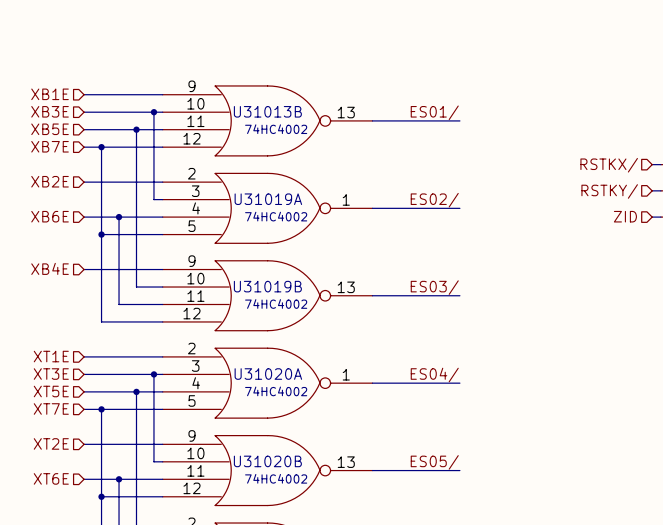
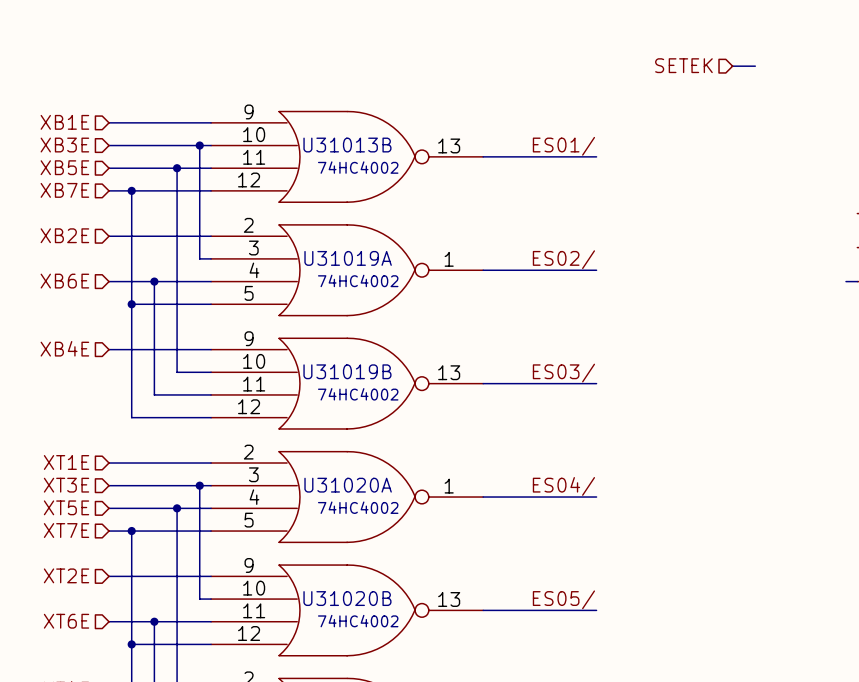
hierarchical label: none -> SETEK (683, 65)
wire: none -> (732, 66) (755, 66)
wire: (652, 164) (660, 164) -> none
hierarchical label: RSTKX/ (609, 165) -> none
wire: (652, 190) (660, 190) -> none
hierarchical label: RSTKY/ (609, 191) -> none
hierarchical label: ZID (625, 216) -> none

